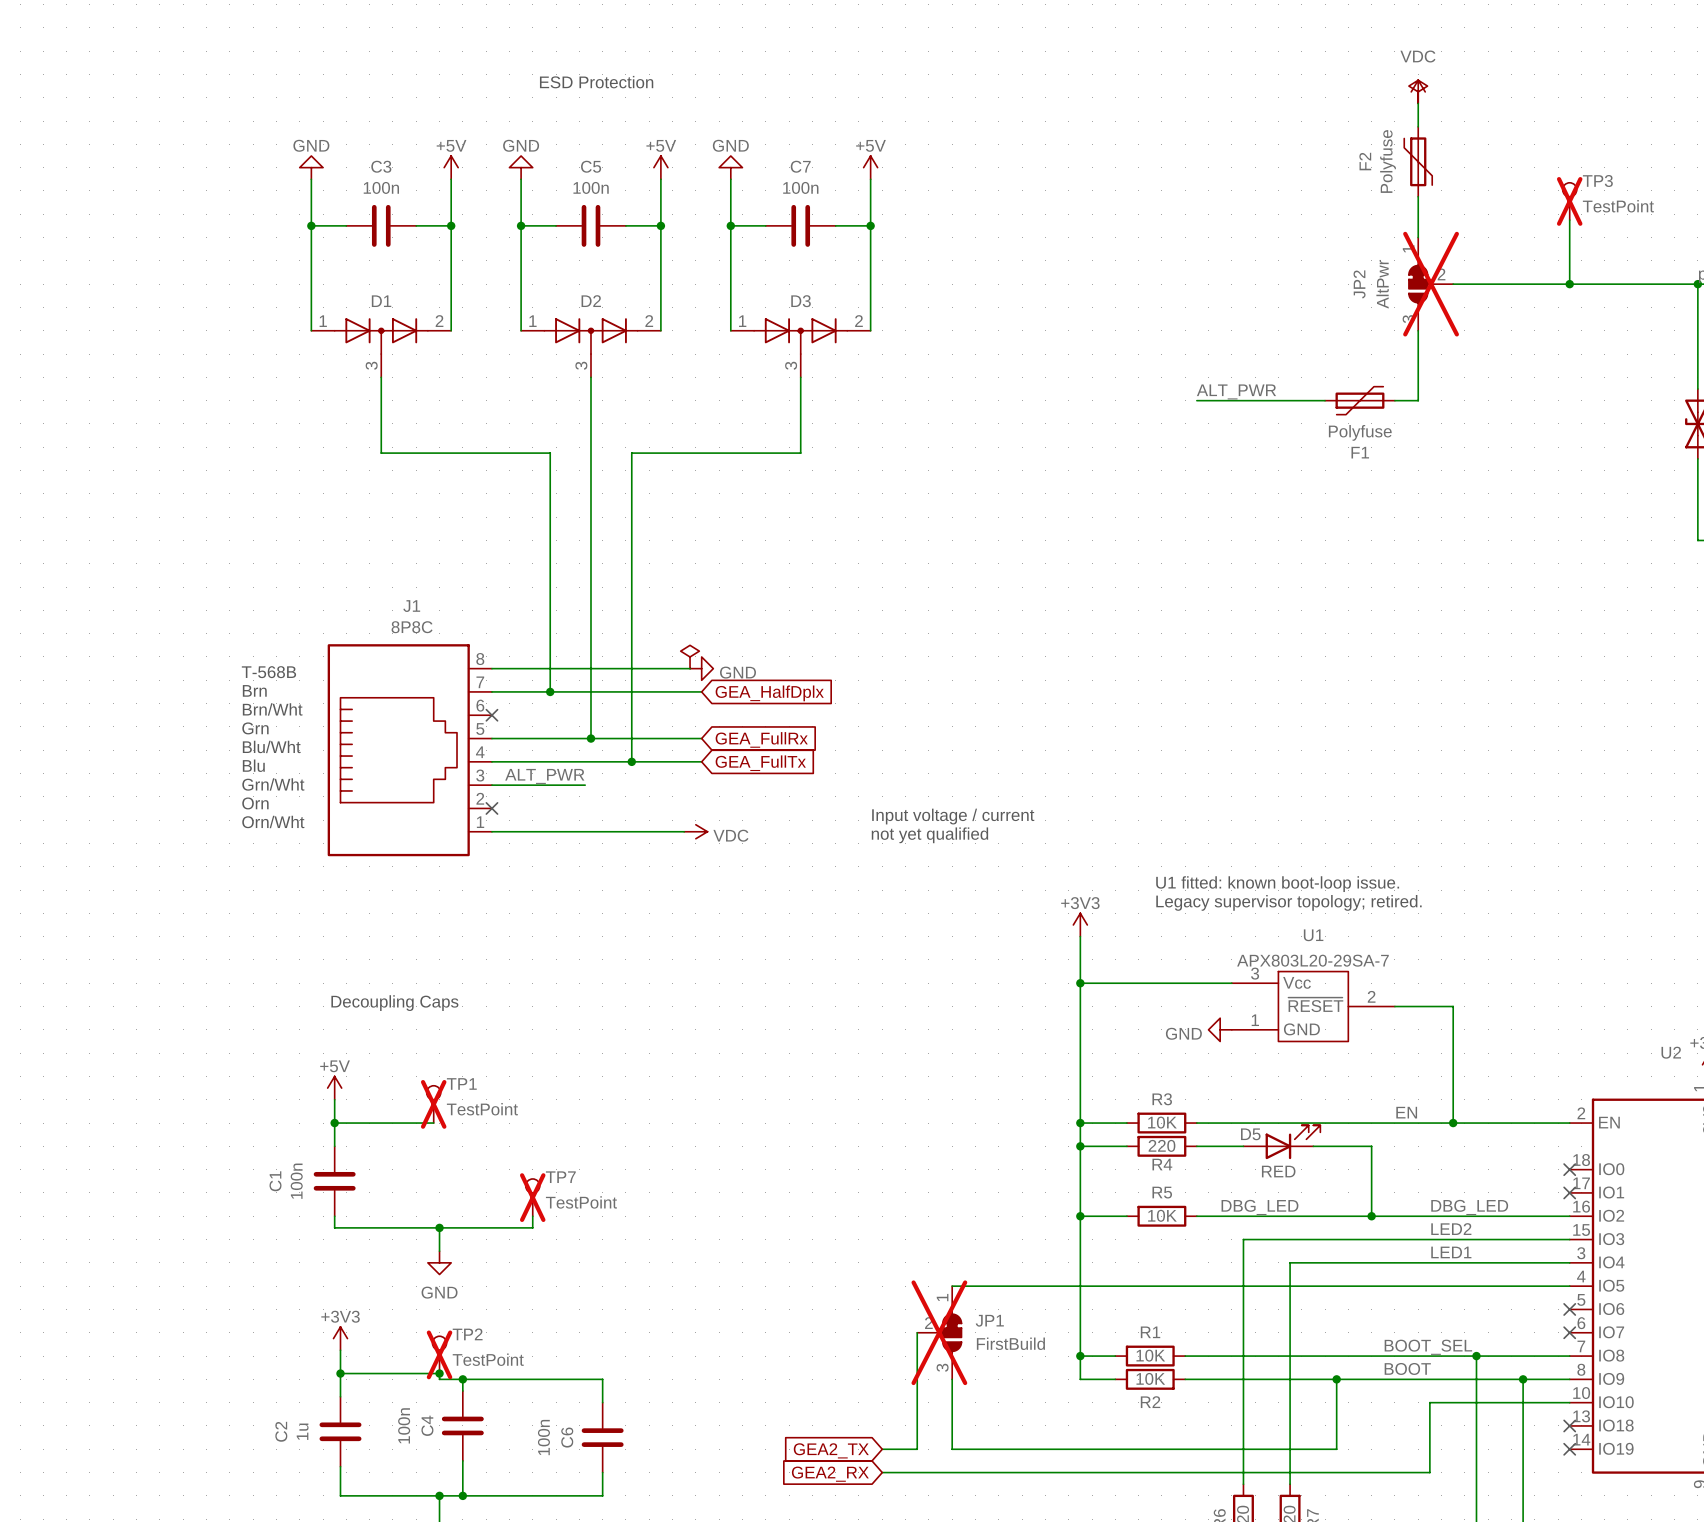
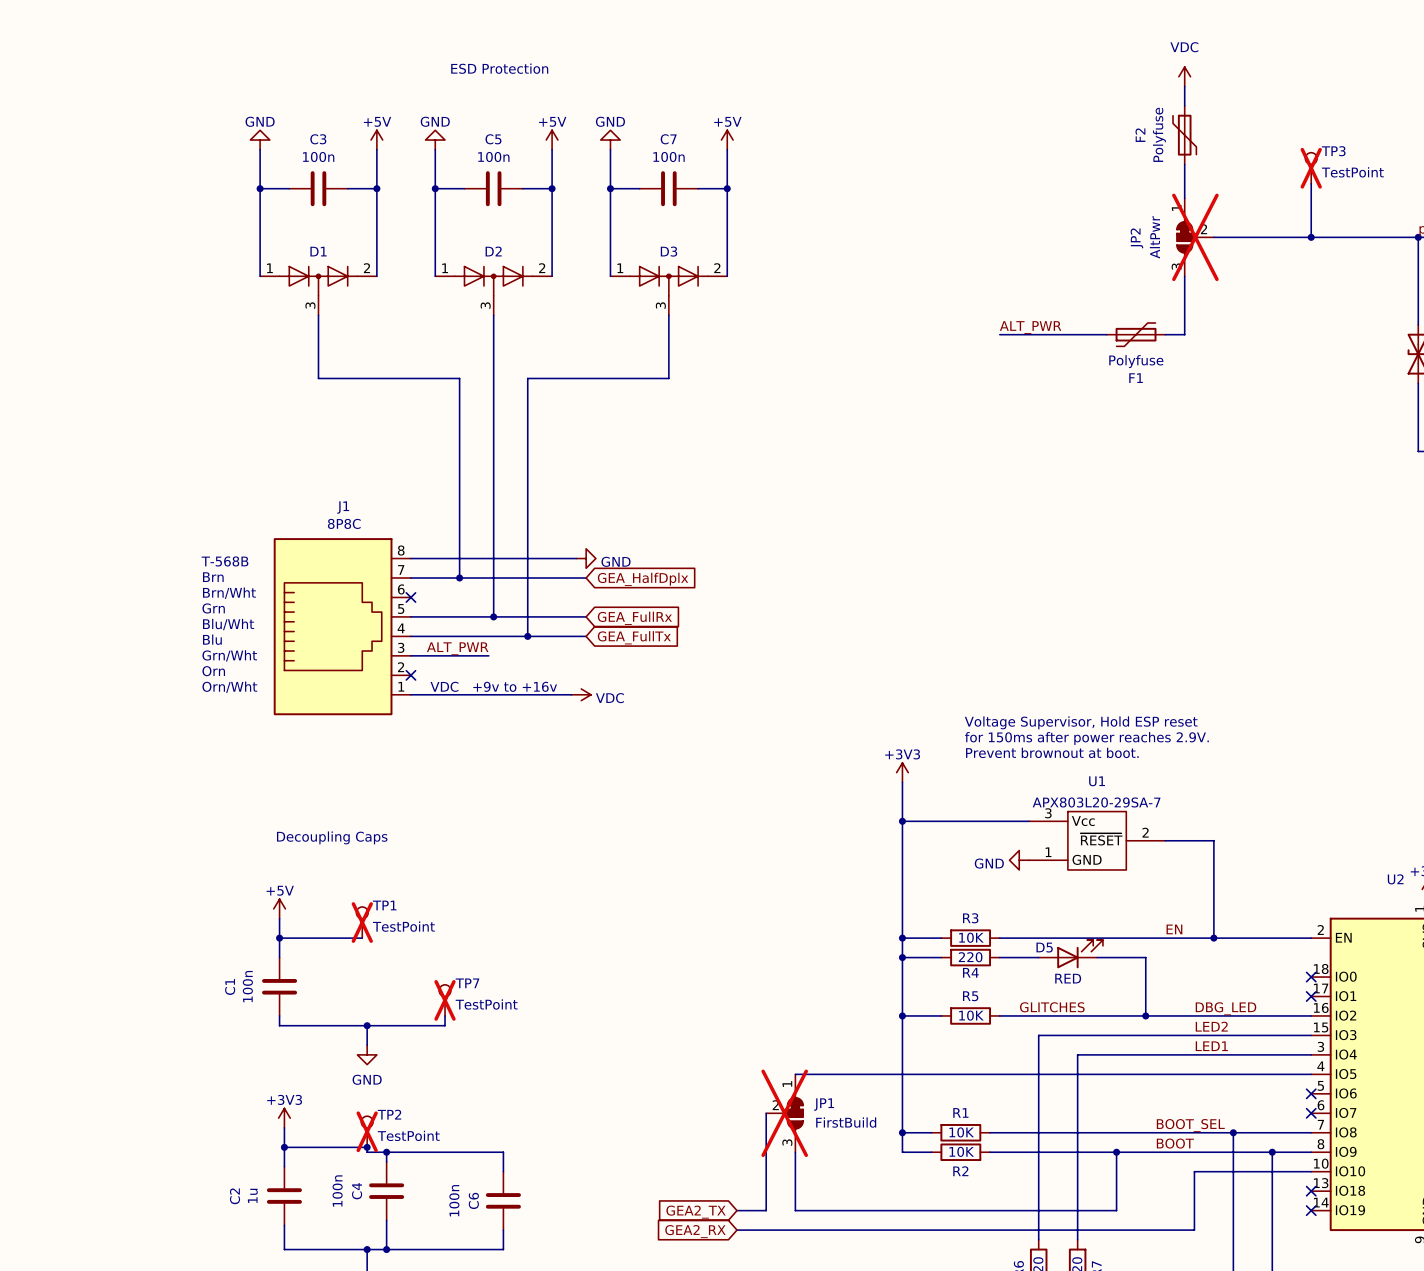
power symbol: (1418, 91) -> none
power symbol: (690, 656) -> none
text: Input voltage / current (953, 816) -> none
text: none -> VDC +9v to +16v (493, 686)
text: not yet qualified (929, 835) -> none
text: none -> Voltage Supervisor, Hold ESP reset (1081, 722)
text: U1 fitted: known boot-loop issue. (1277, 884) -> for 150ms after power reaches 2.9V. (1086, 738)
text: Legacy supervisor topology; retired. (1288, 902) -> Prevent brownout at boot. (1052, 752)
label: DBG_LED (1259, 1207) -> GLITCHES (1052, 1007)

